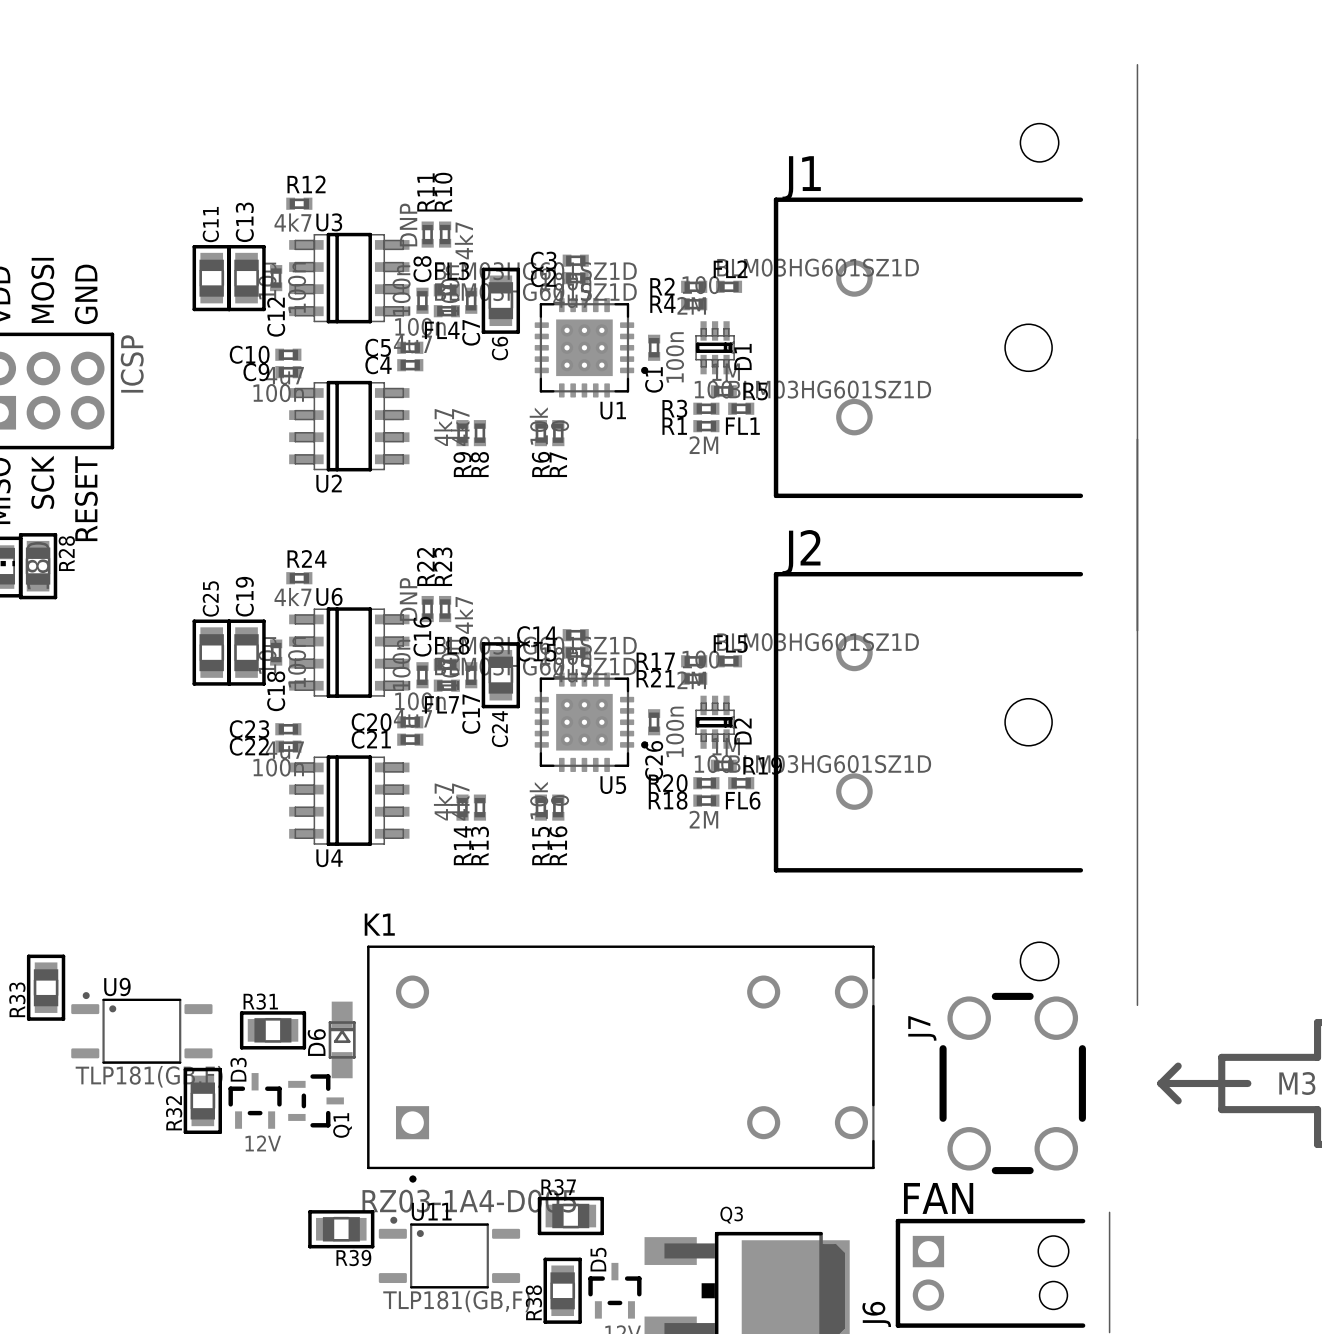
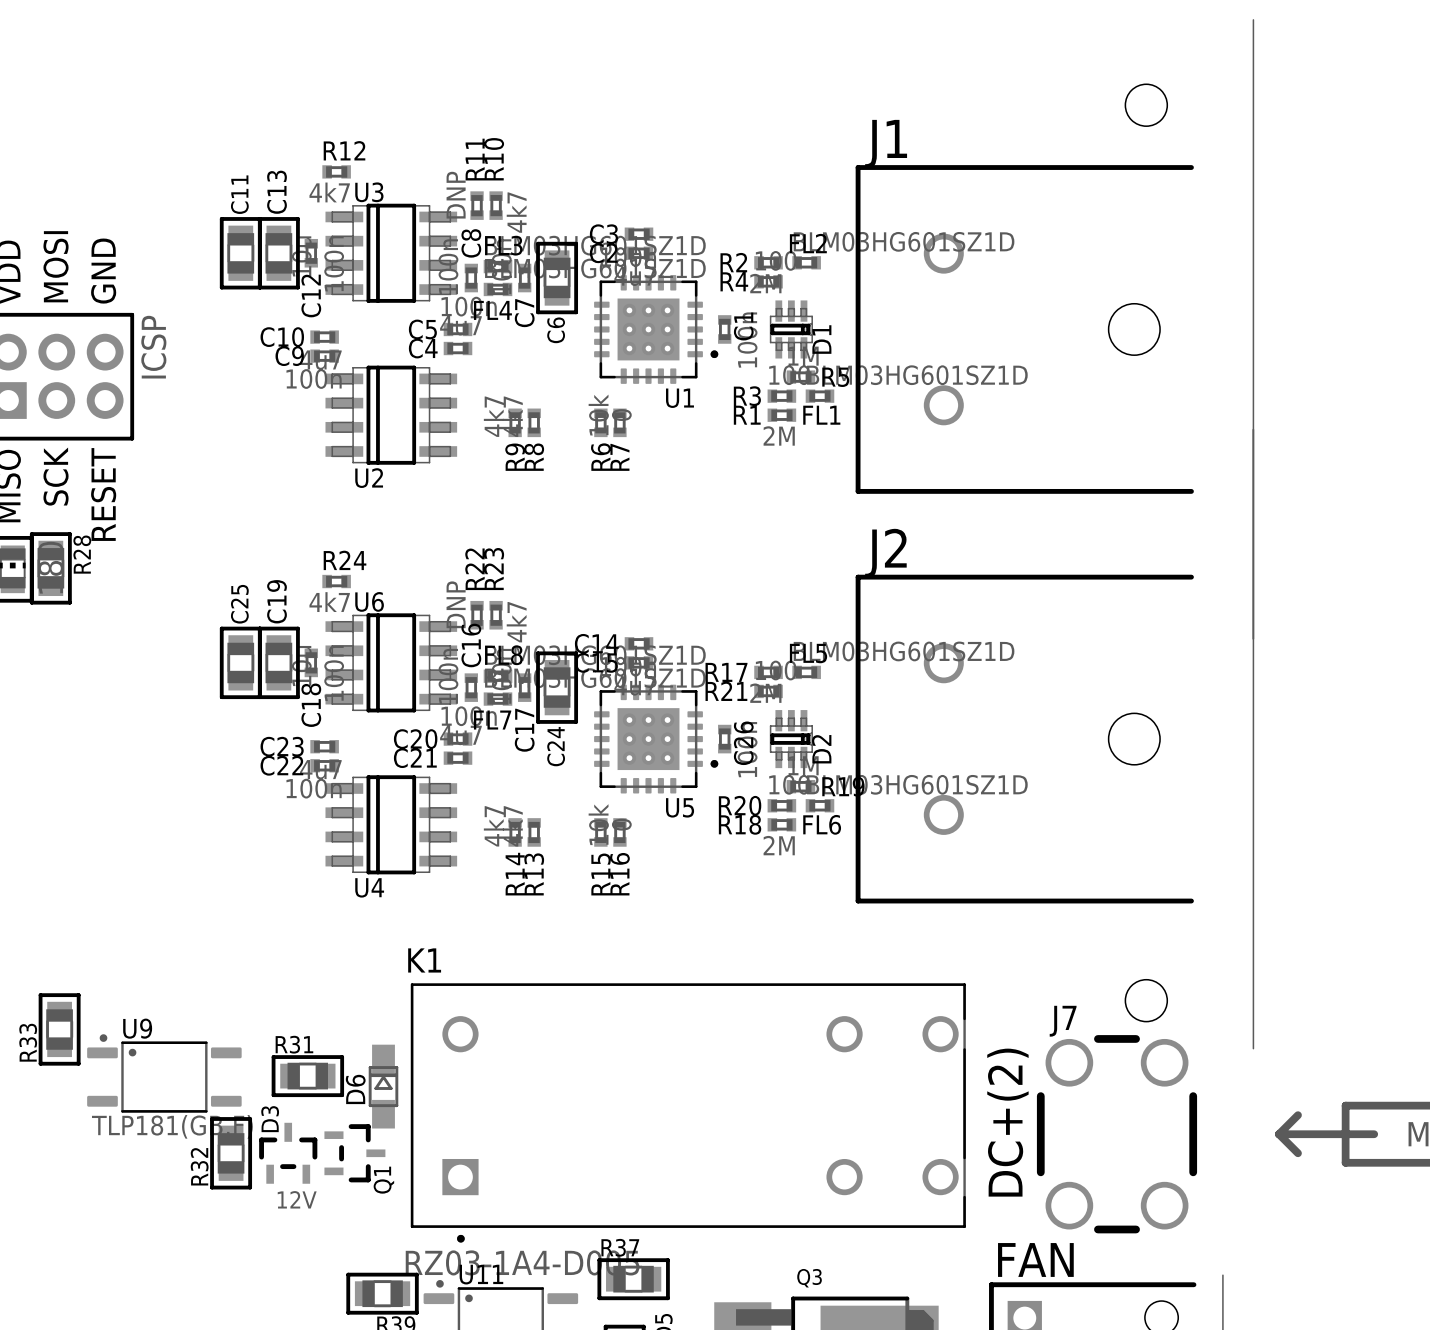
C1 name position: C1 (654, 379) -> C1 (743, 326)
C26 name position: C26 (654, 760) -> C26 (743, 743)
J7 name rotation: 0° (922, 1028) -> 90° clockwise (1063, 1021)
J7 name position: J7 (922, 1028) -> J7 (1063, 1021)
text: none -> DC+(2) (1007, 1122)

